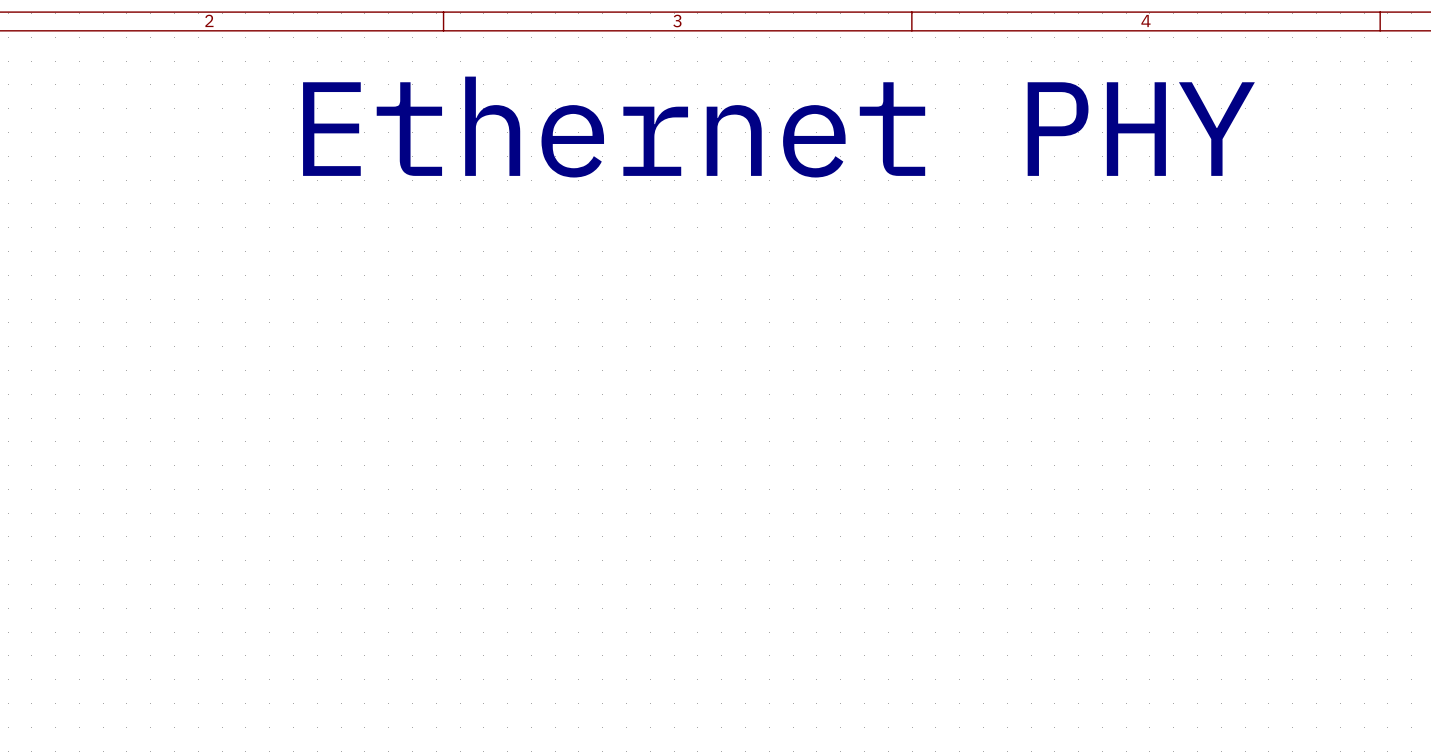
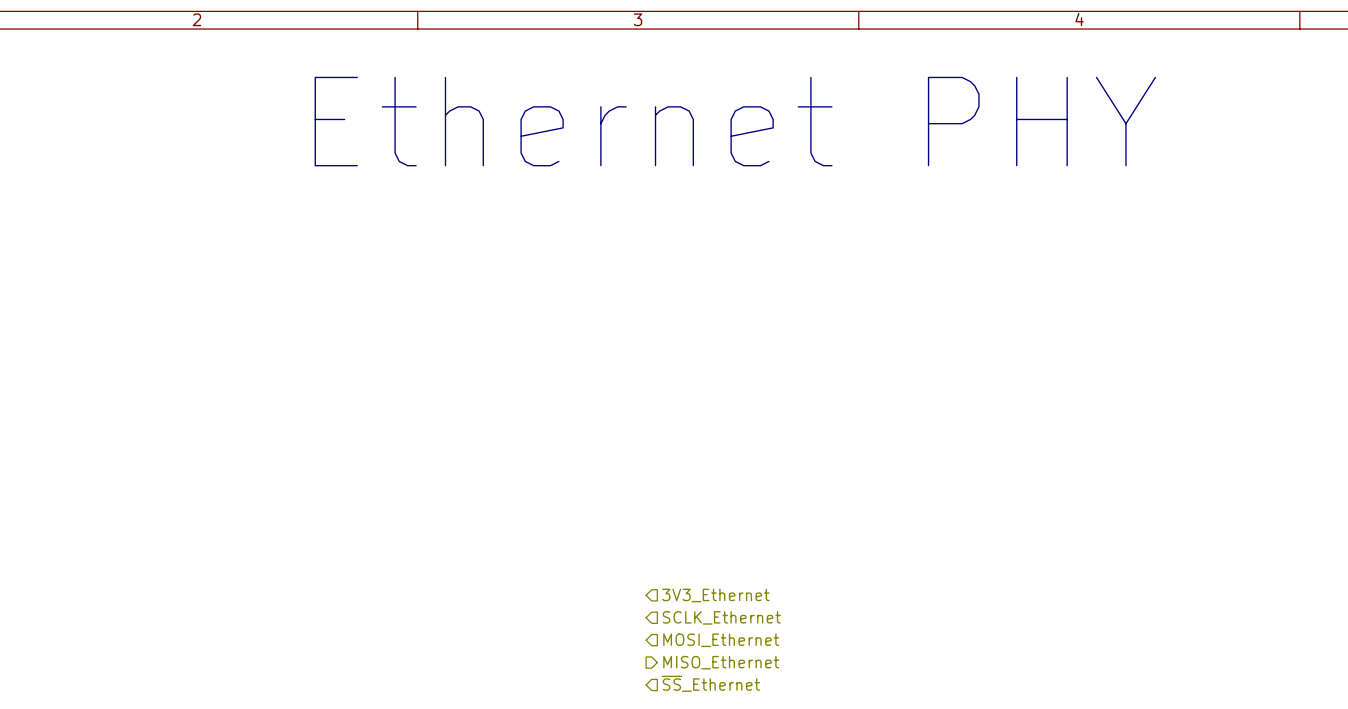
hierarchical label: none -> 3V3_Ethernet (715, 595)
hierarchical label: none -> SCLK_Ethernet (721, 617)
hierarchical label: none -> MOSI_Ethernet (721, 640)
hierarchical label: none -> MISO_Ethernet (721, 662)
hierarchical label: none -> ~{SS}_Ethernet (710, 683)

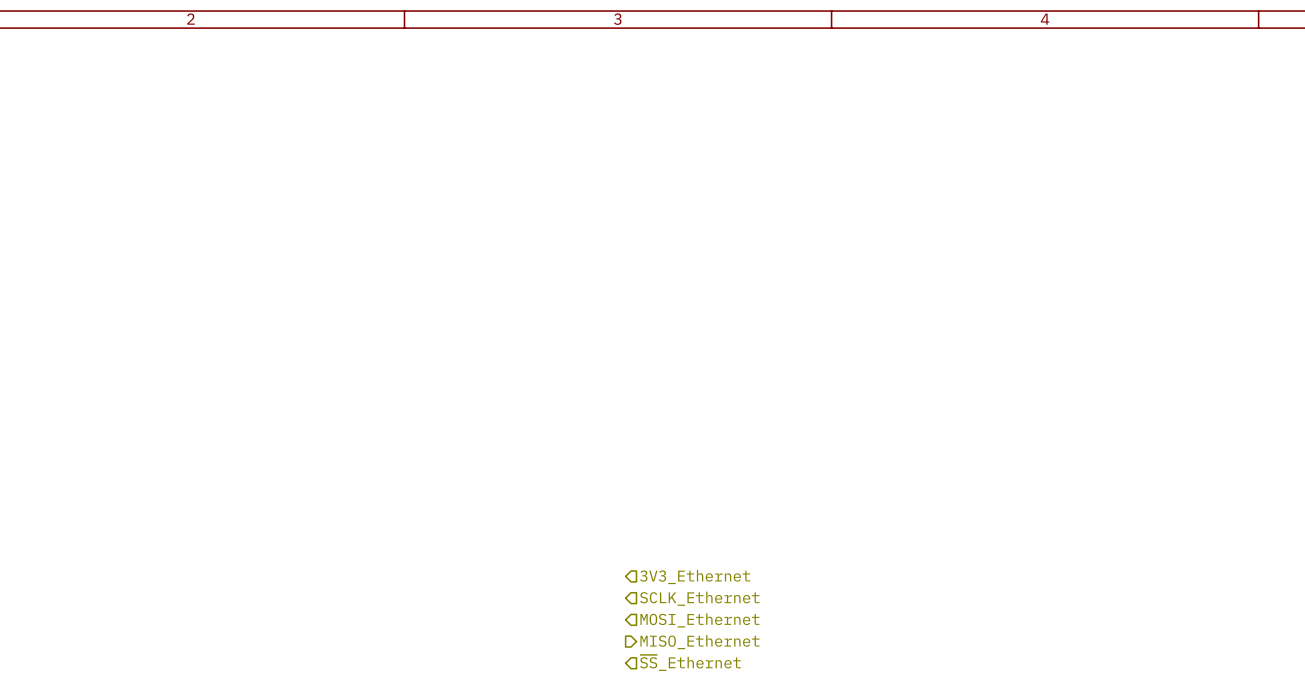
text: Ethernet PHY (735, 121) -> none

